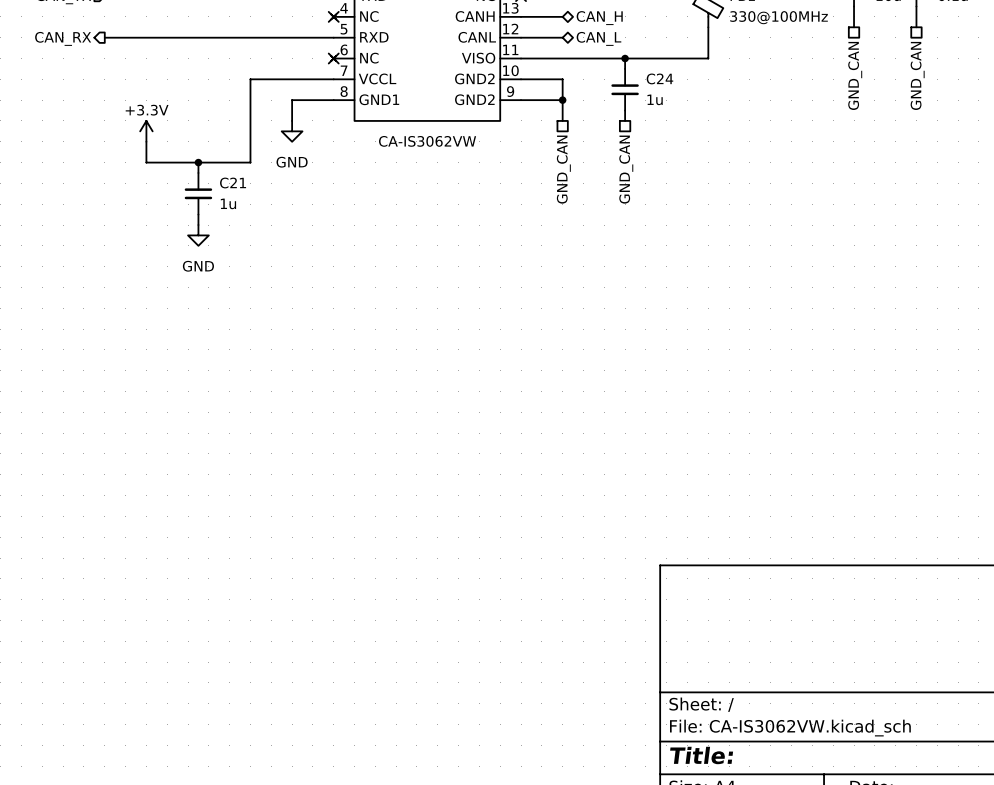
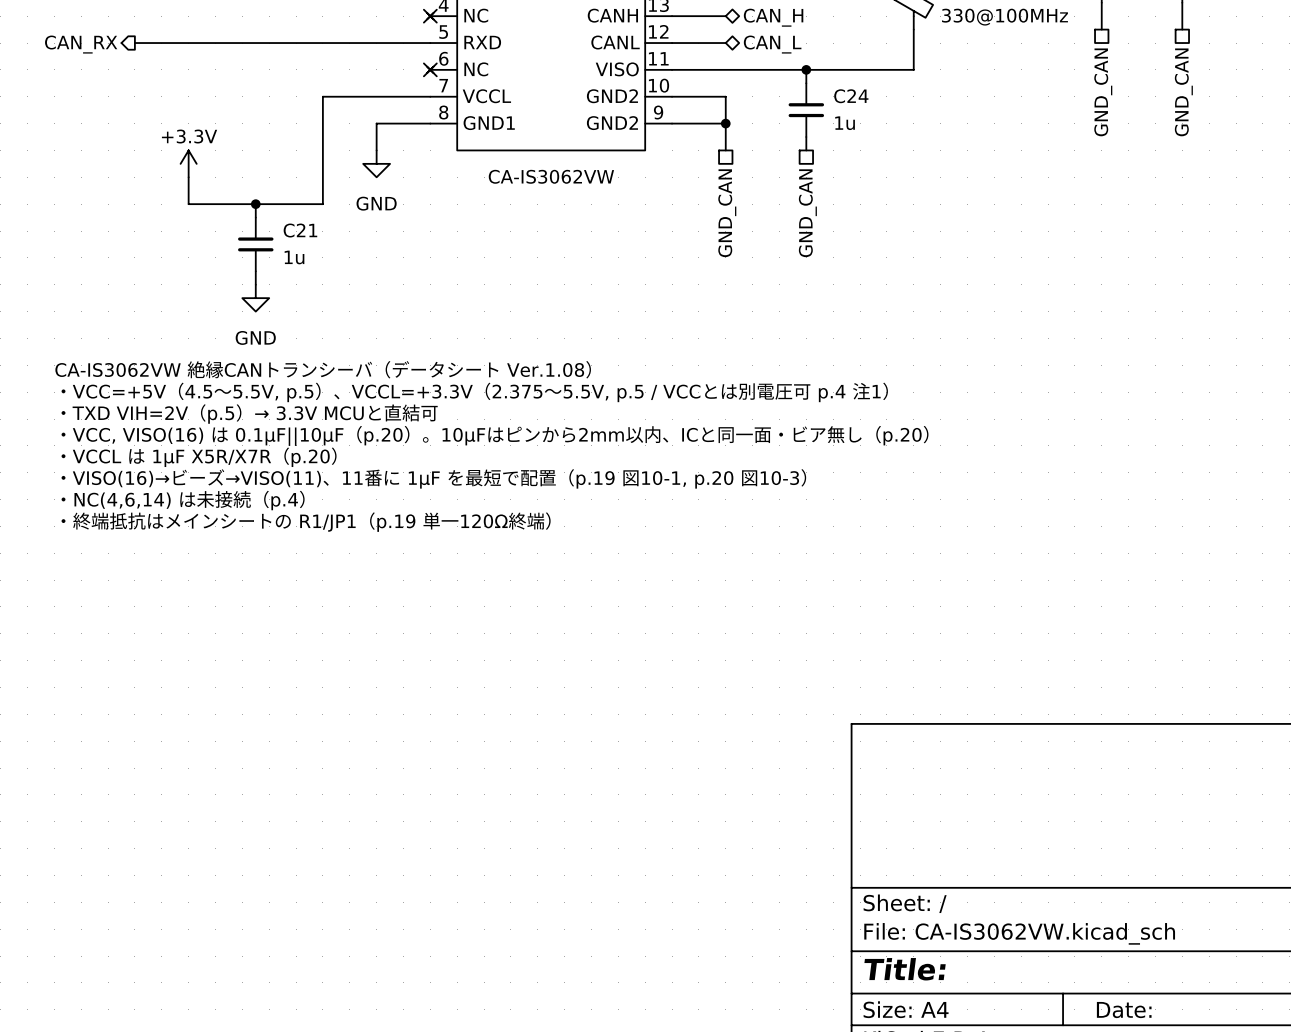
text: none -> CA-IS3062VW 絶縁CANトランシーバ（データシート Ver.1.08） (323, 369)
text: none -> ・VCC=+5V（4.5〜5.5V, p.5）、VCCL=+3.3V（2.375〜5.5V, p.5 / VCCとは別電圧可 p.4 注1） (474, 392)
text: none -> ・TXD VIH=2V（p.5）→ 3.3V MCUと直結可 (249, 414)
text: none -> ・VCC, VISO(16) は 0.1µF||10µF（p.20）。10µFはピンから2mm以内、ICと同一面・ビア無し（p.20） (495, 435)
text: none -> ・VCCL は 1µF X5R/X7R（p.20） (199, 457)
text: none -> ・VISO(16)→ビーズ→VISO(11)、11番に 1µF を最短で配置（p.19 図10-1, p.20 図10-3） (433, 478)
text: none -> ・NC(4,6,14) は未接続（p.4） (183, 500)
text: none -> ・終端抵抗はメインシートの R1/JP1（p.19 単一120Ω終端） (306, 522)

